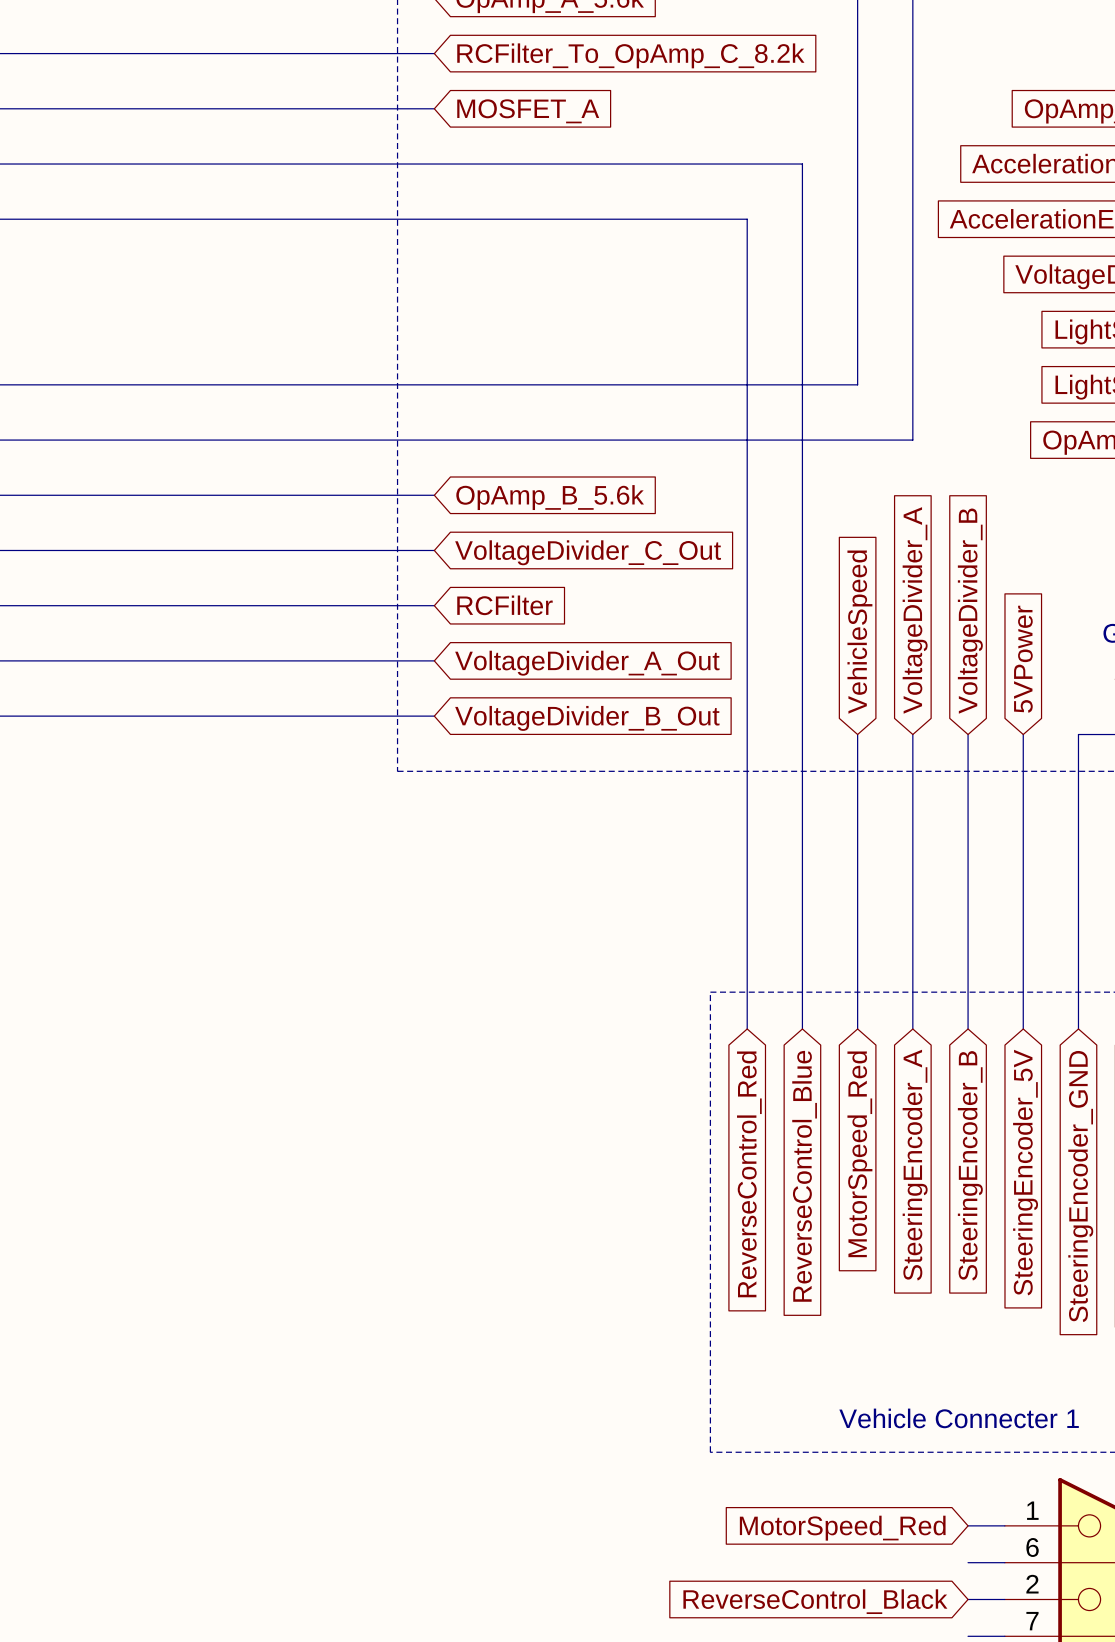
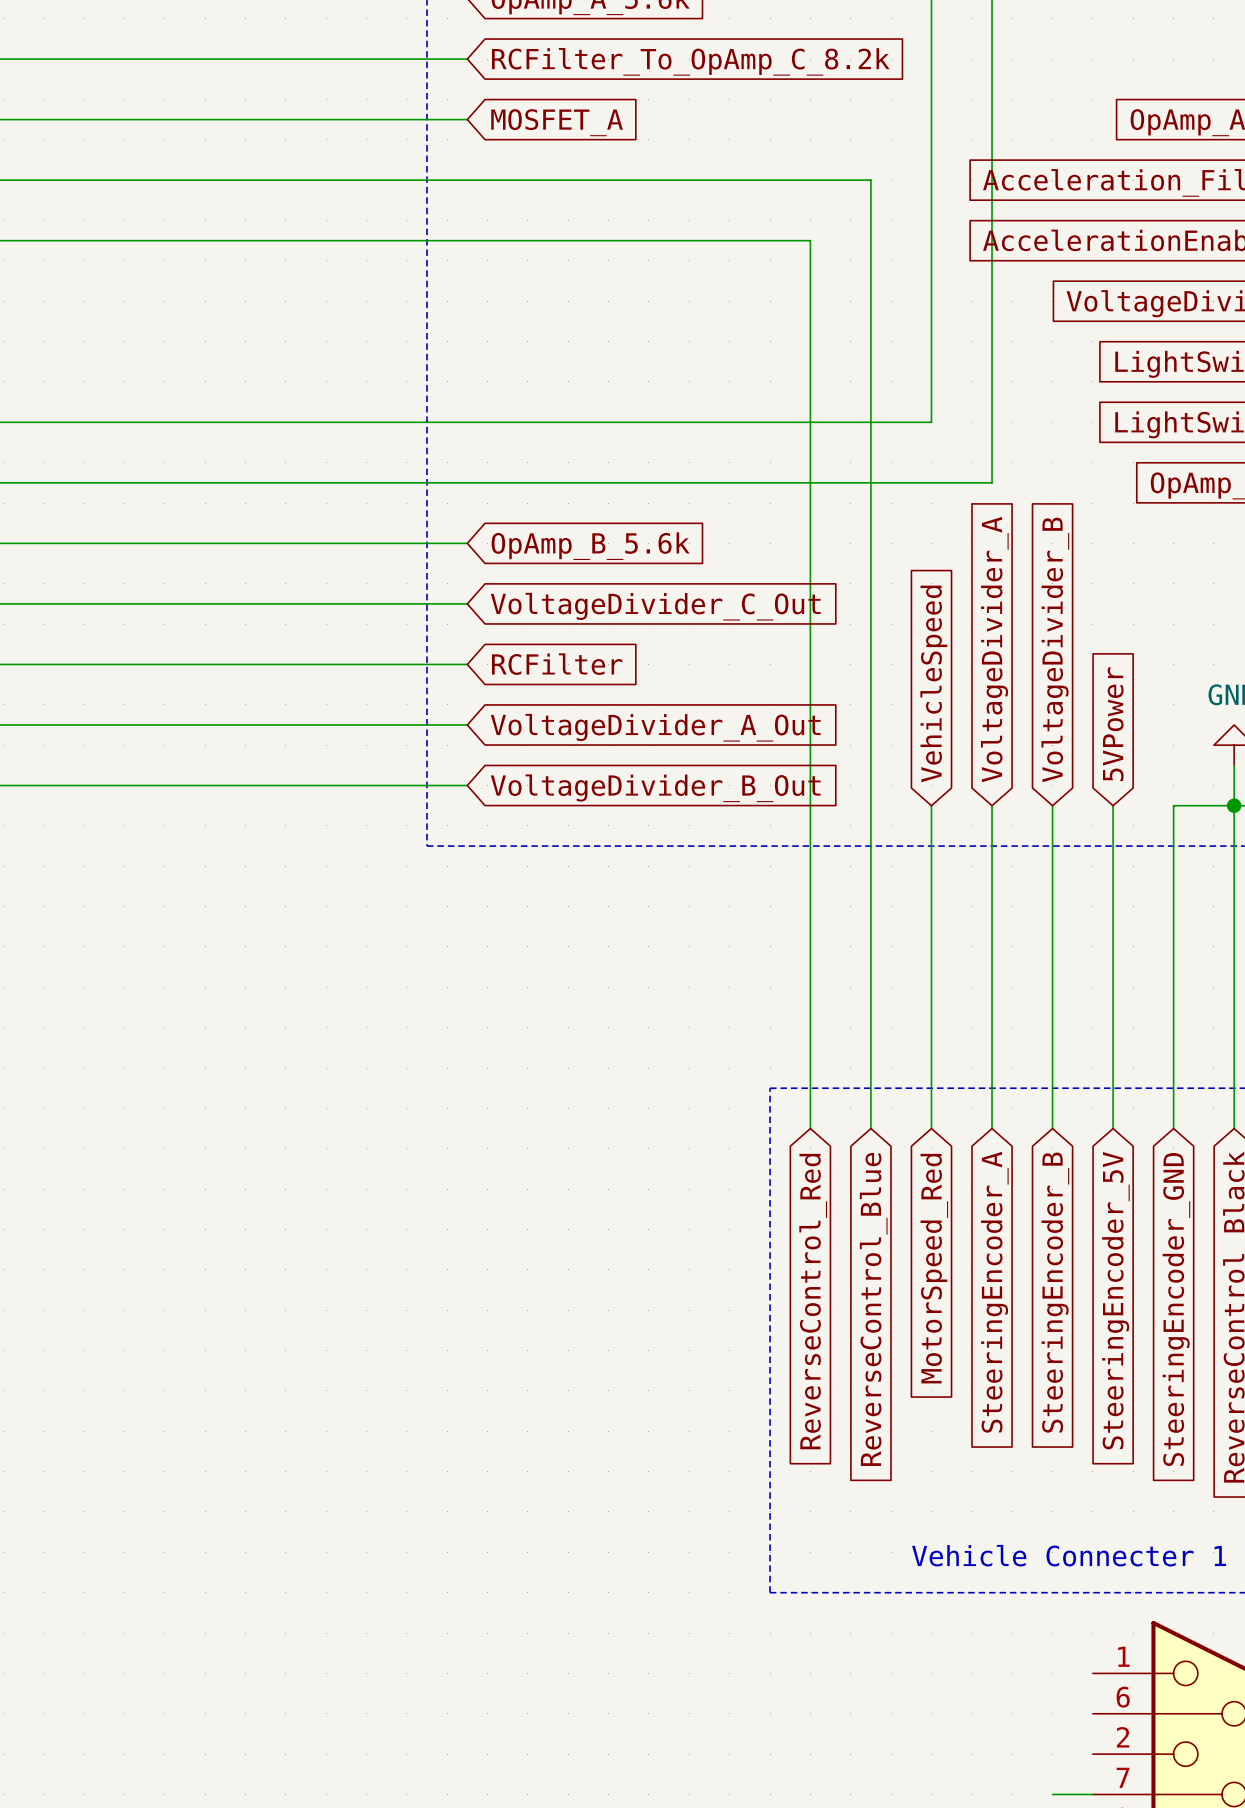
wire: (968, 1525) (1004, 1525) -> none
global label: MotorSpeed_Red (842, 1528) -> none
wire: (968, 1562) (1004, 1562) -> none
wire: (968, 1599) (1004, 1599) -> none
global label: ReverseControl_Black (815, 1601) -> none

